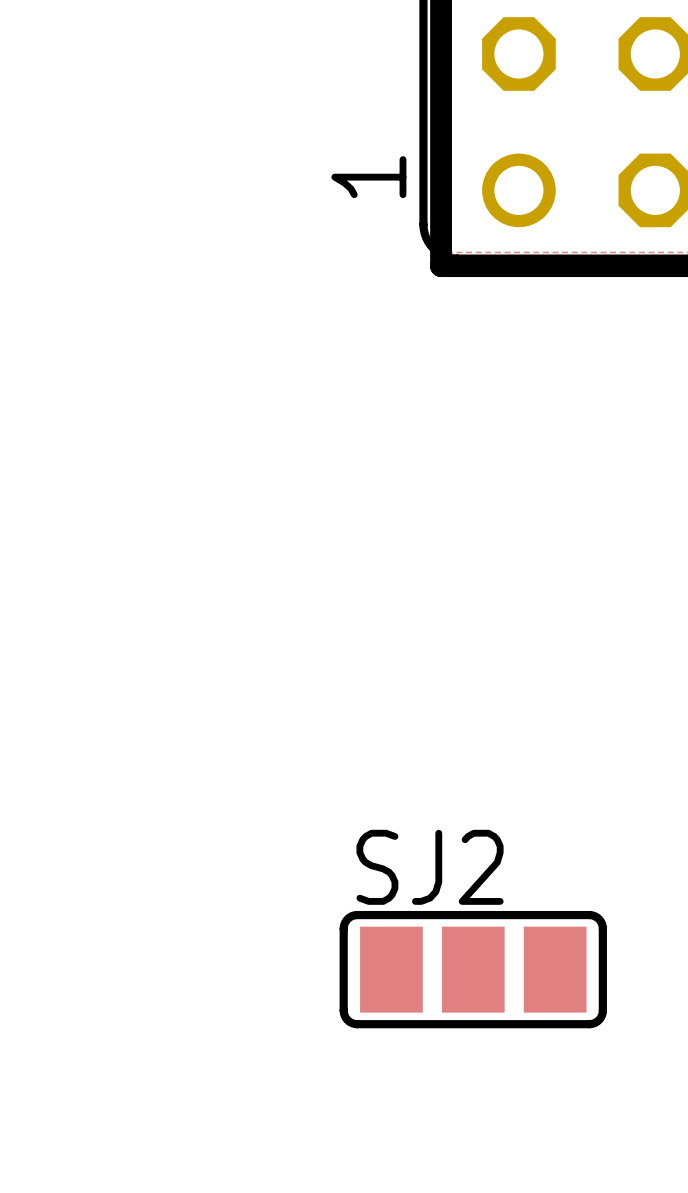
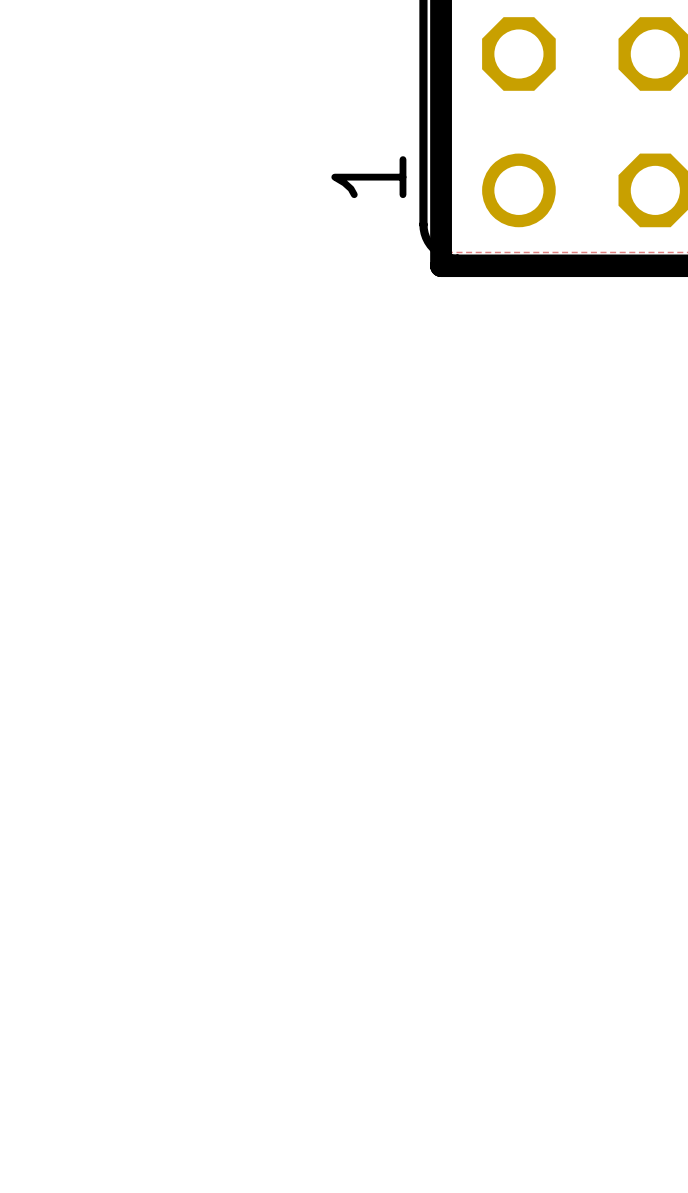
SJ2: (473, 969) -> none

